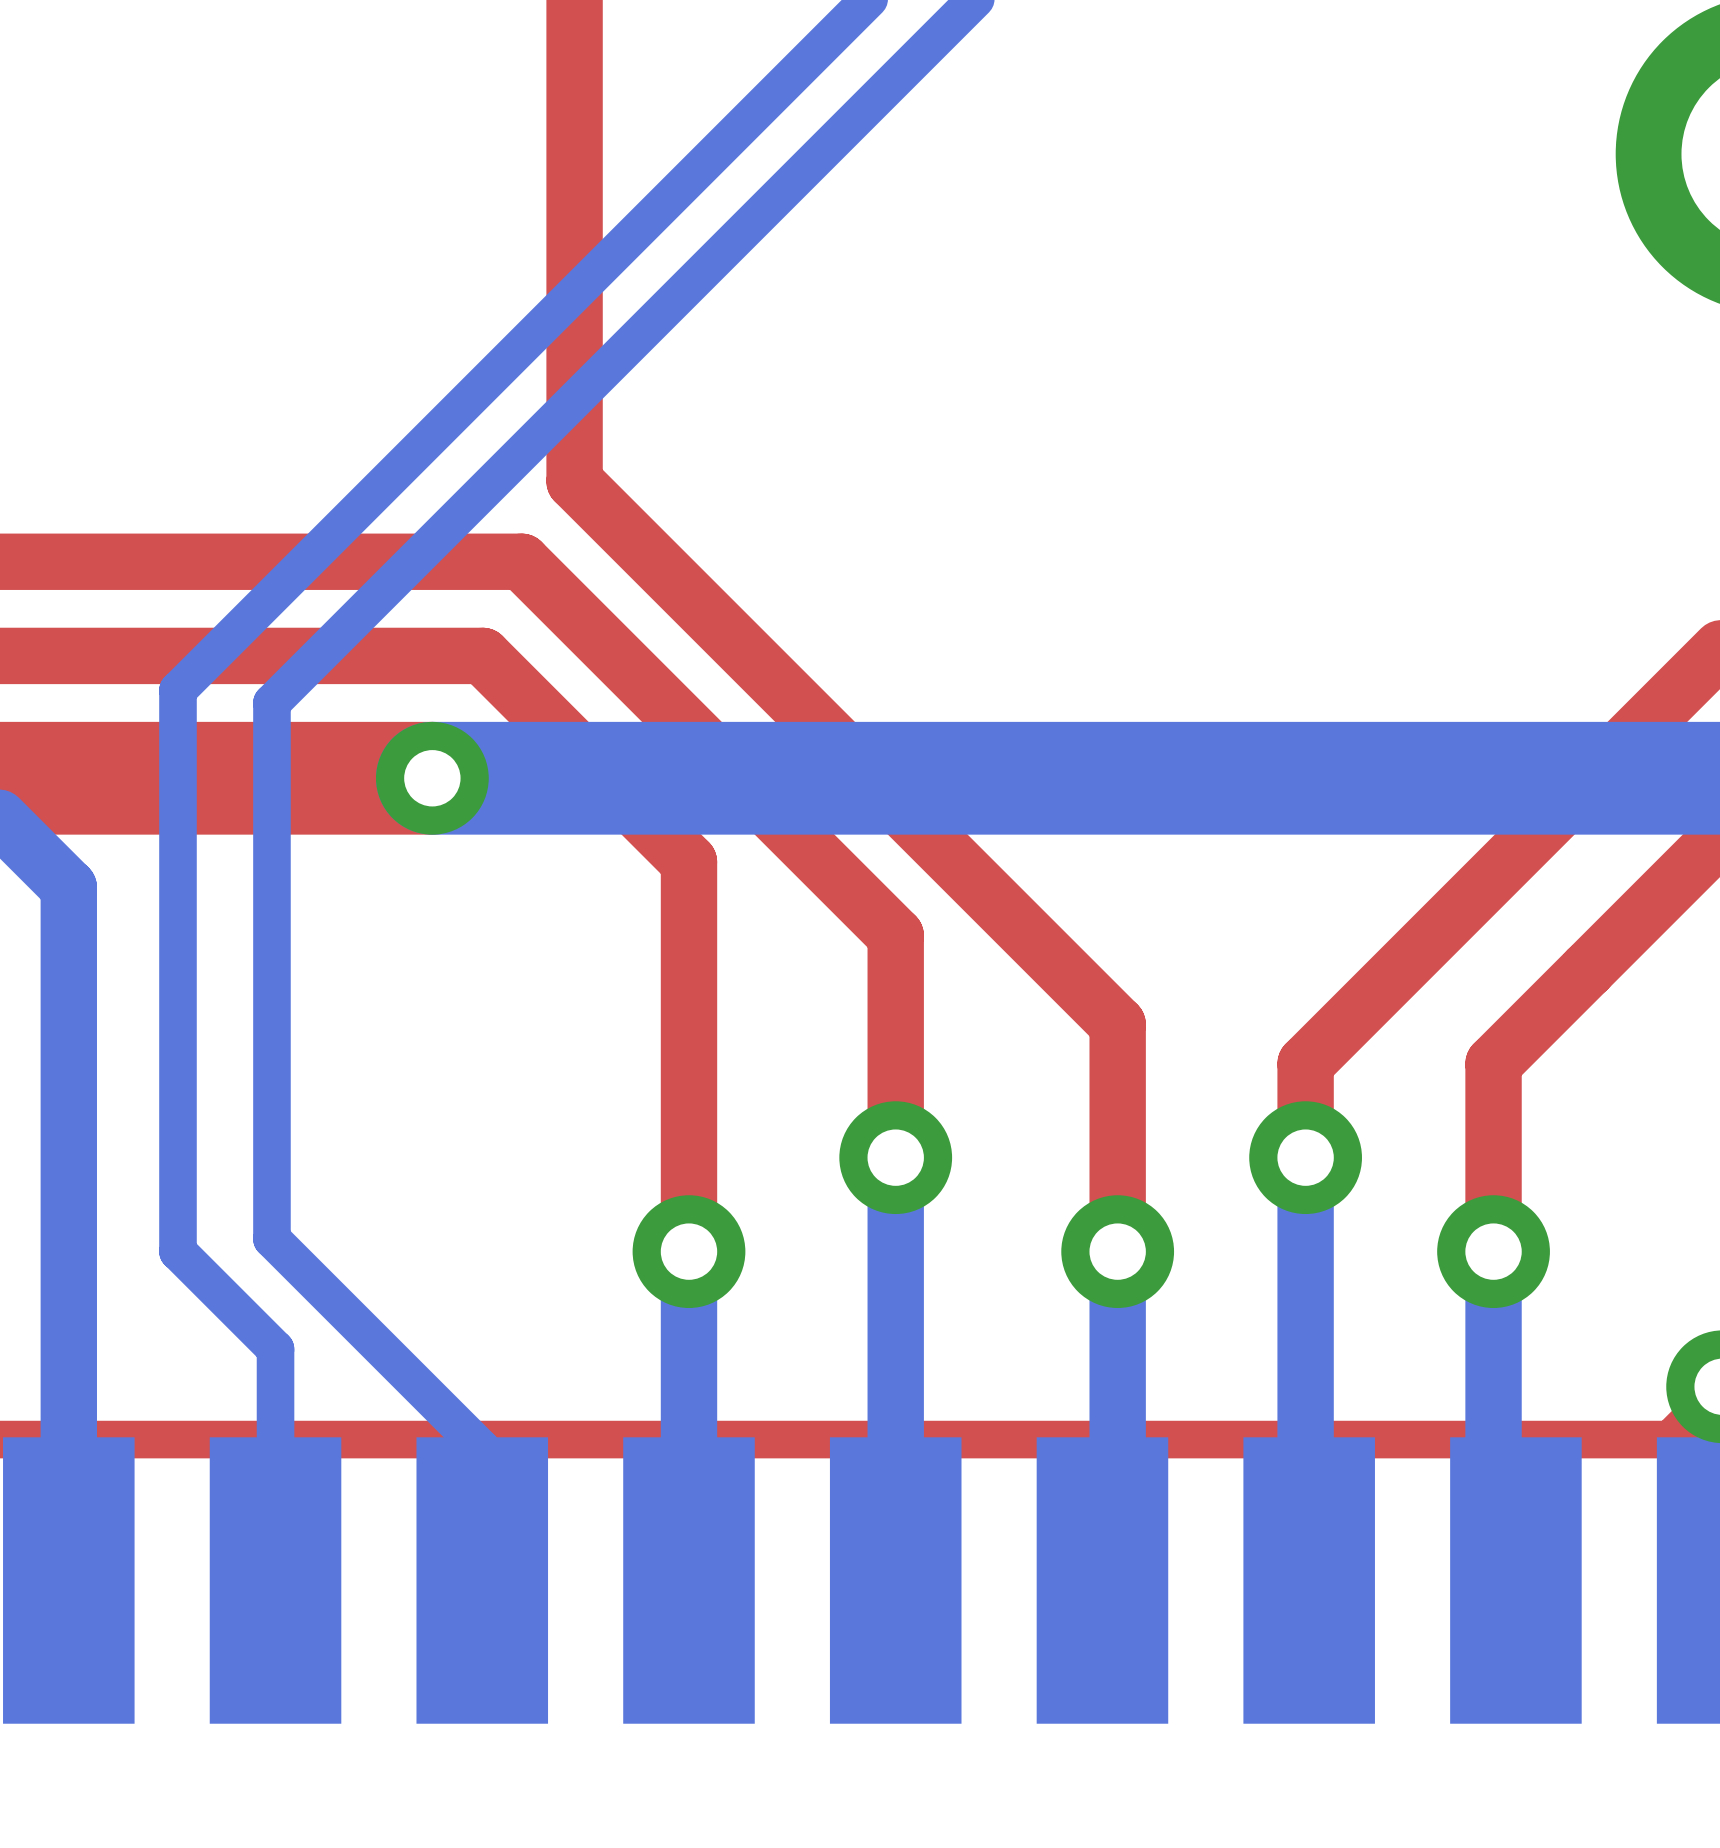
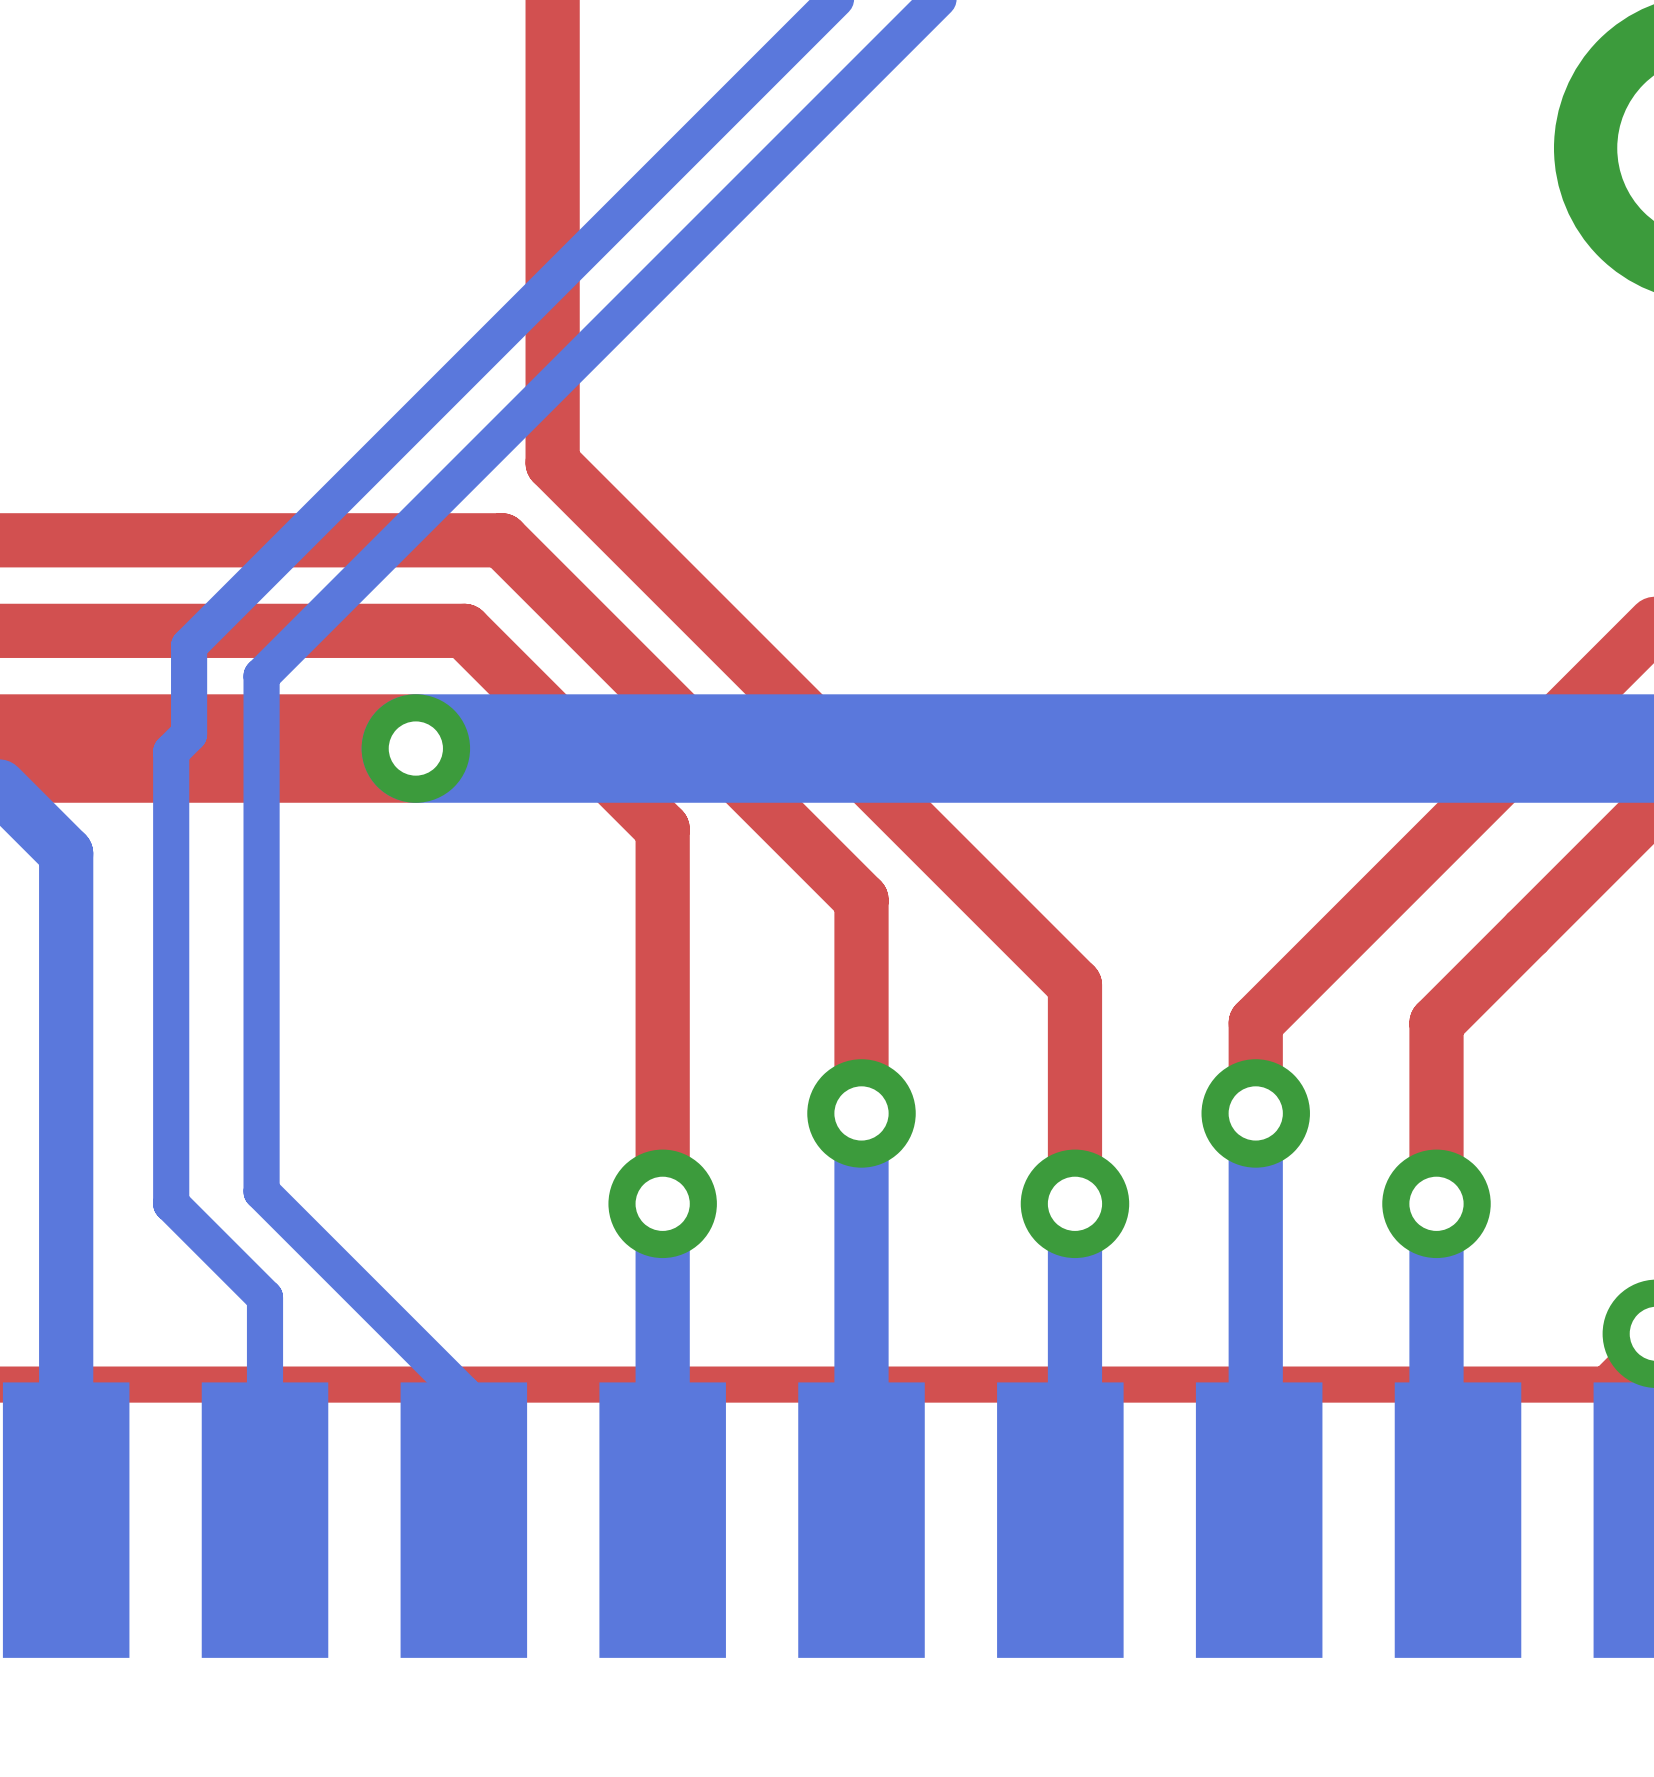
bottom track: (196, 671) (177, 690) (177, 781) -> (189, 645) (189, 734) (171, 751)

